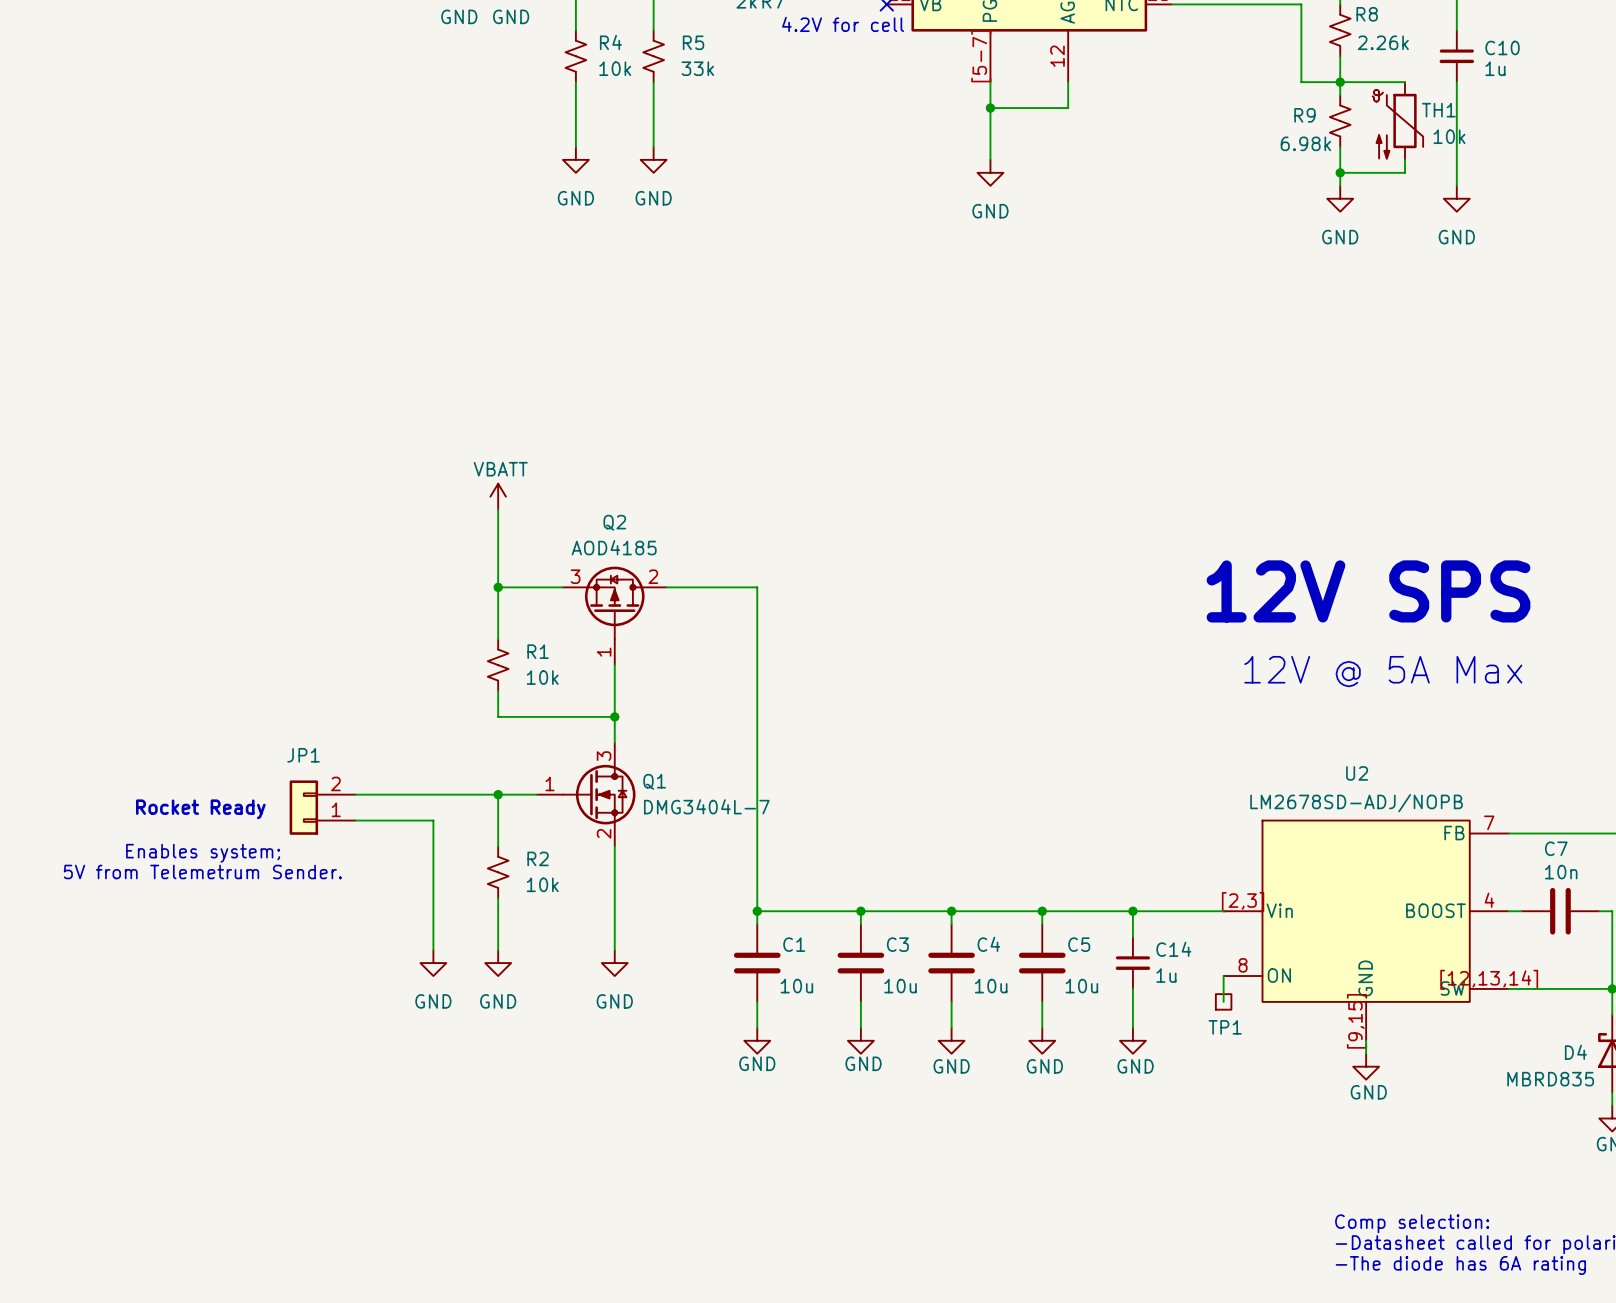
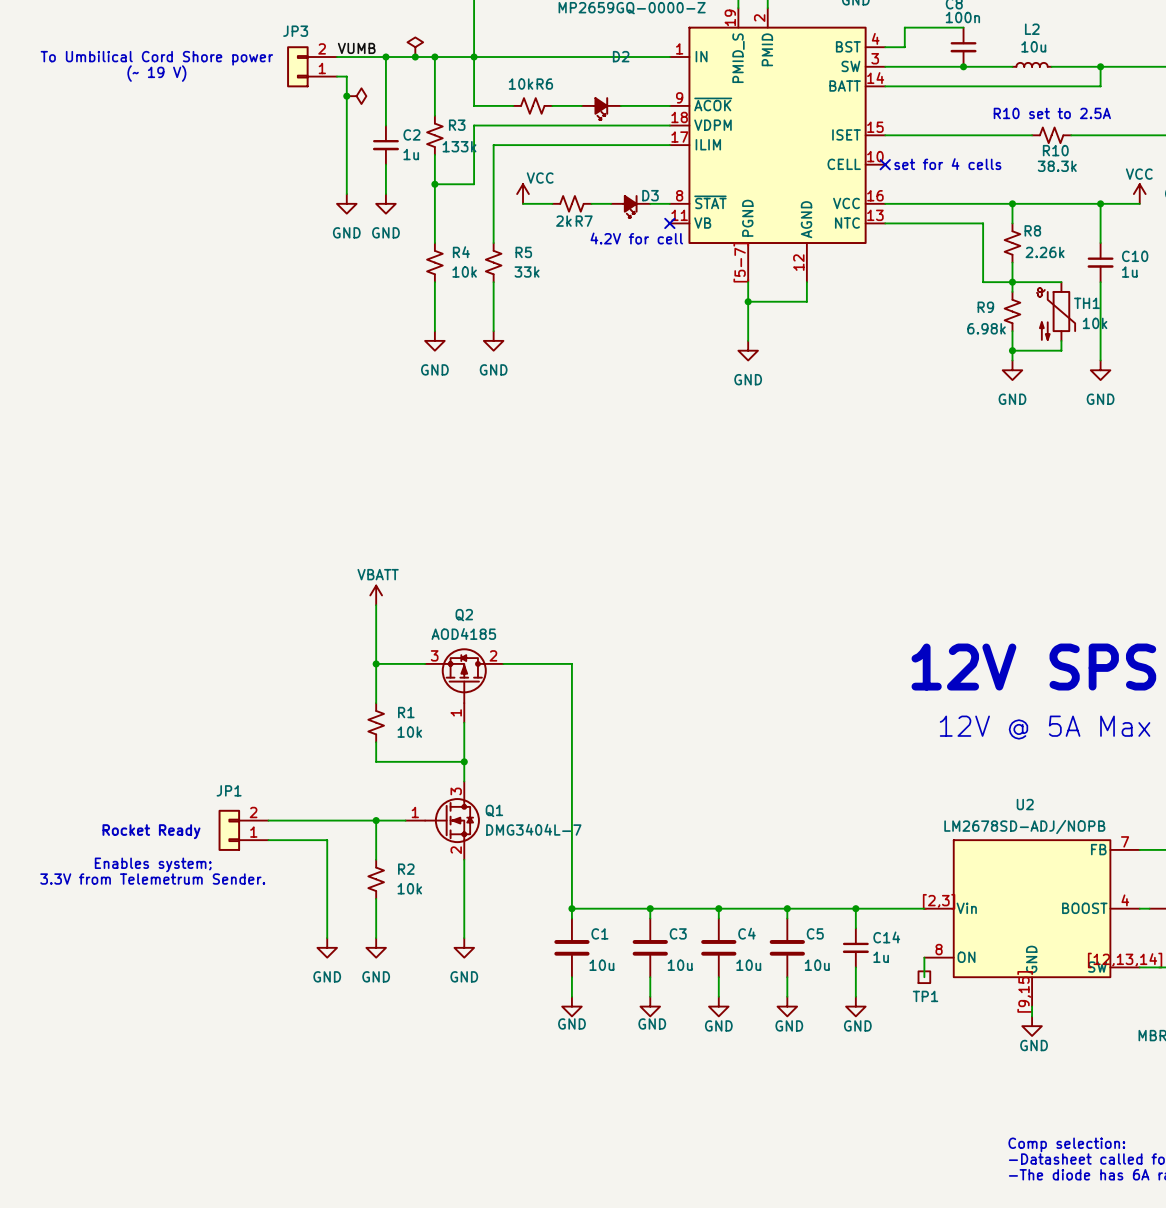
text: 5V from Telemetrum Sender. (202, 872) -> 3.3V from Telemetrum Sender. (152, 879)

